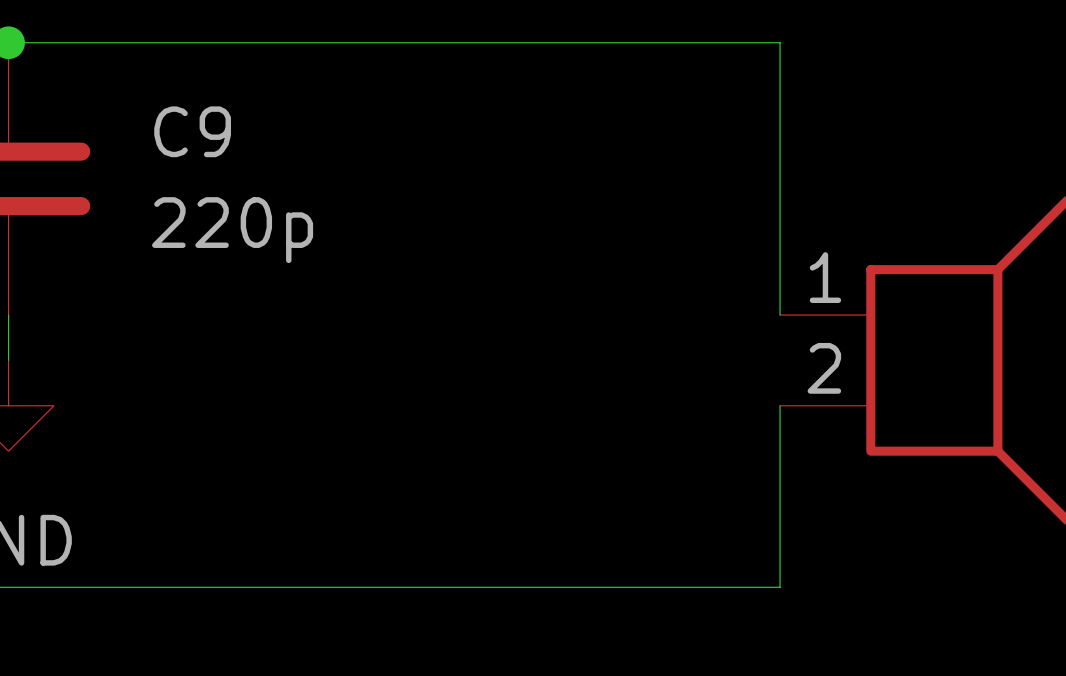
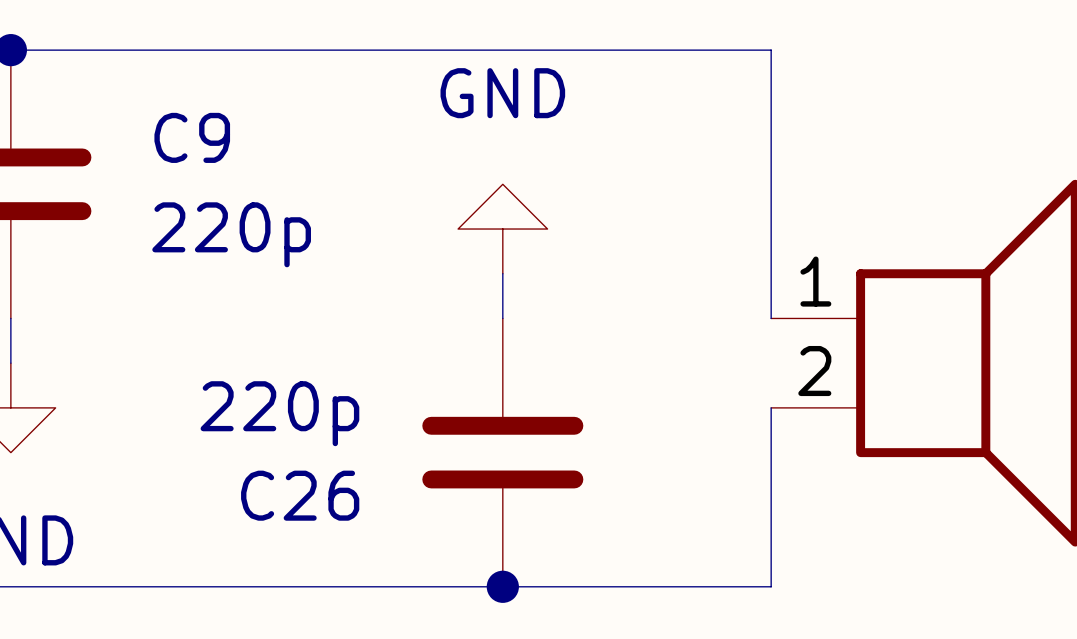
power symbol: none -> GND (502, 229)
wire: none -> (502, 273) (502, 318)
C26: none -> 220p (502, 452)
junction: none -> (502, 586)

